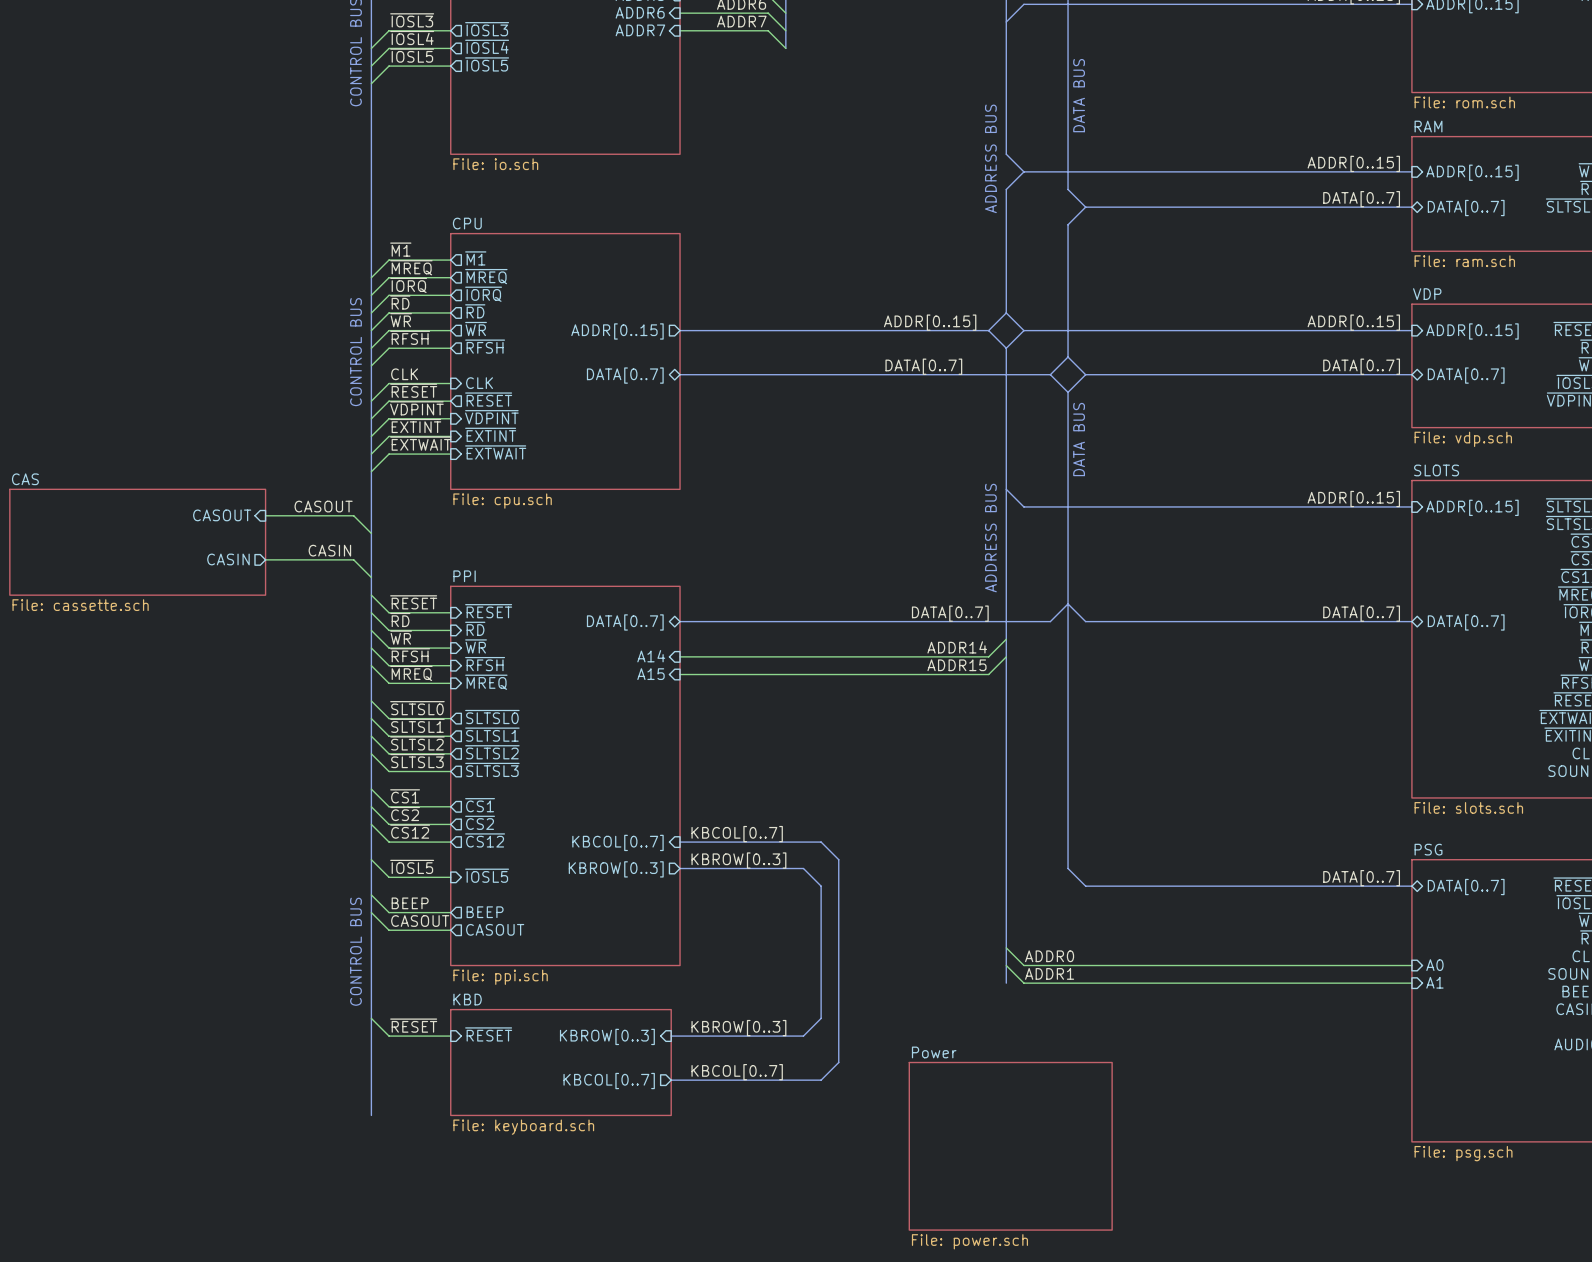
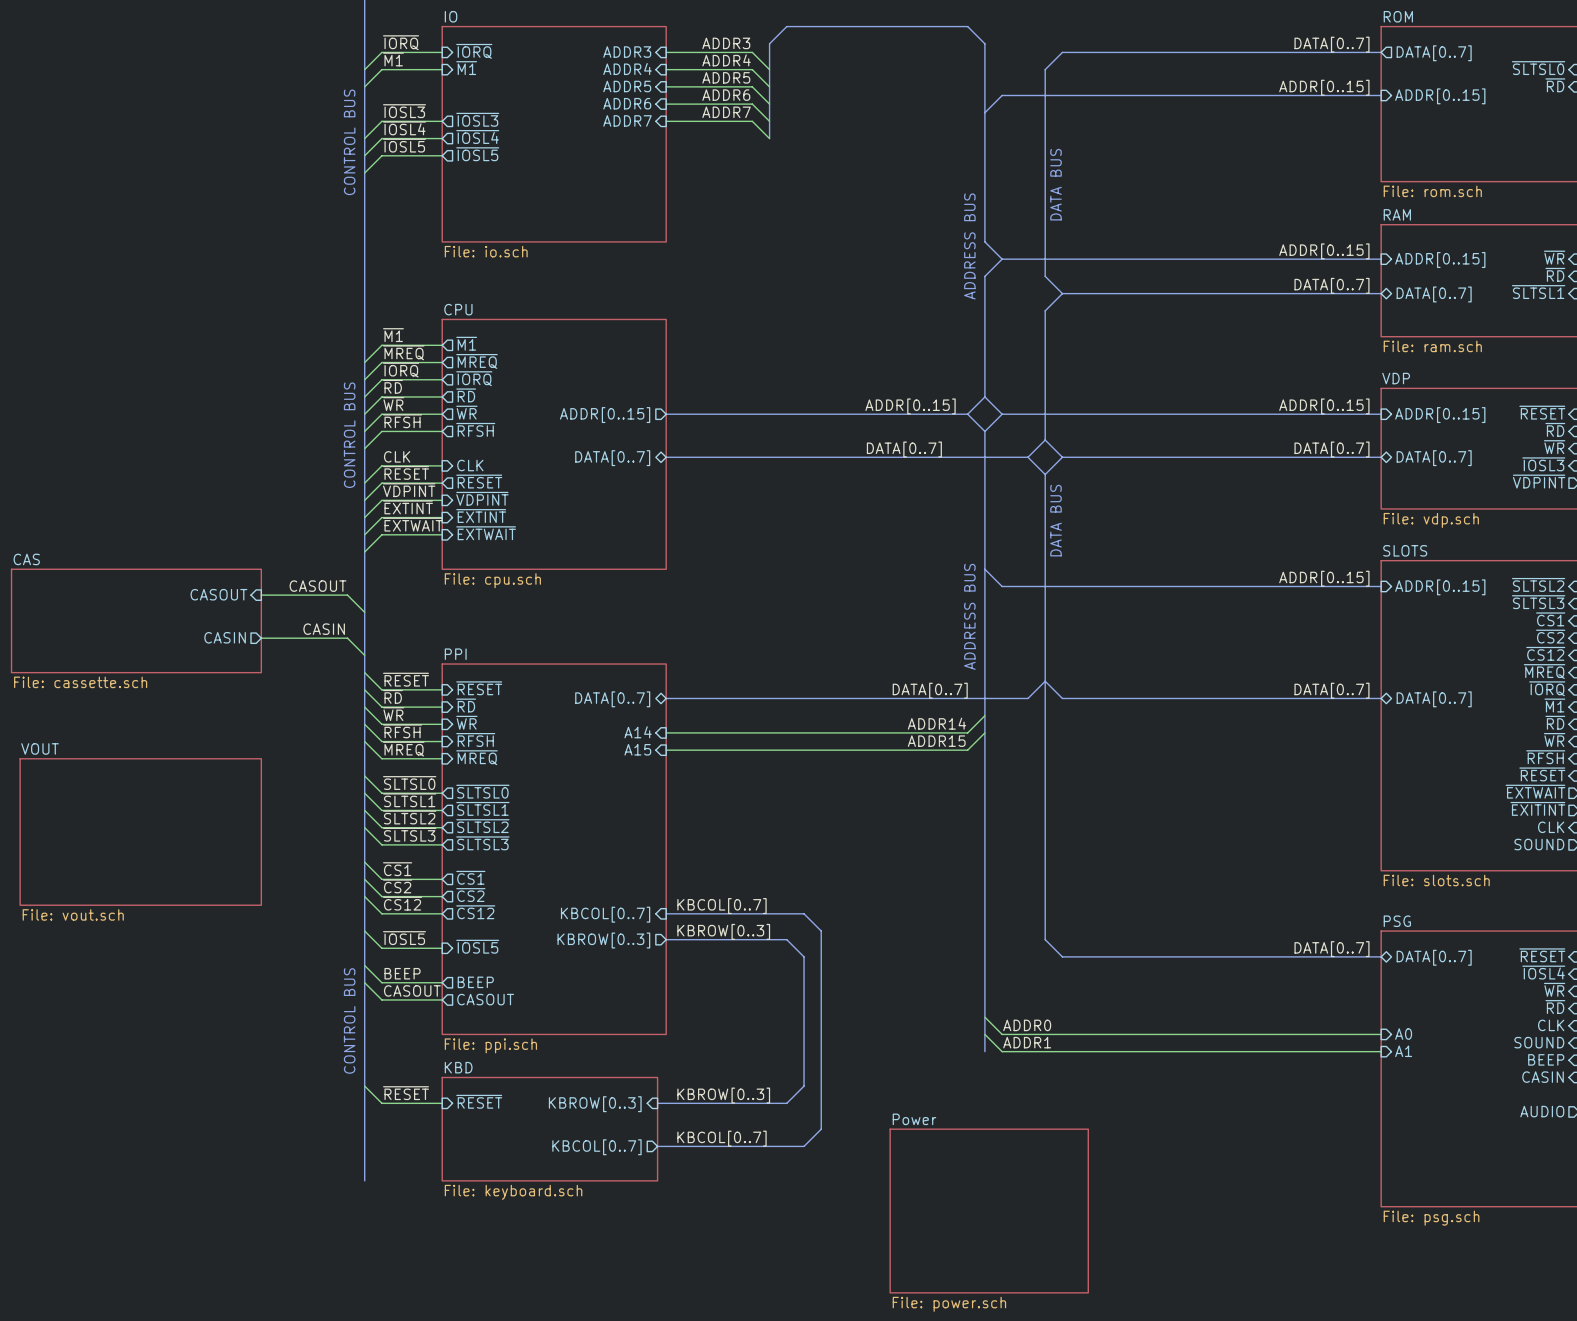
sheet VOUT: none -> File: vout.sch (140, 832)

